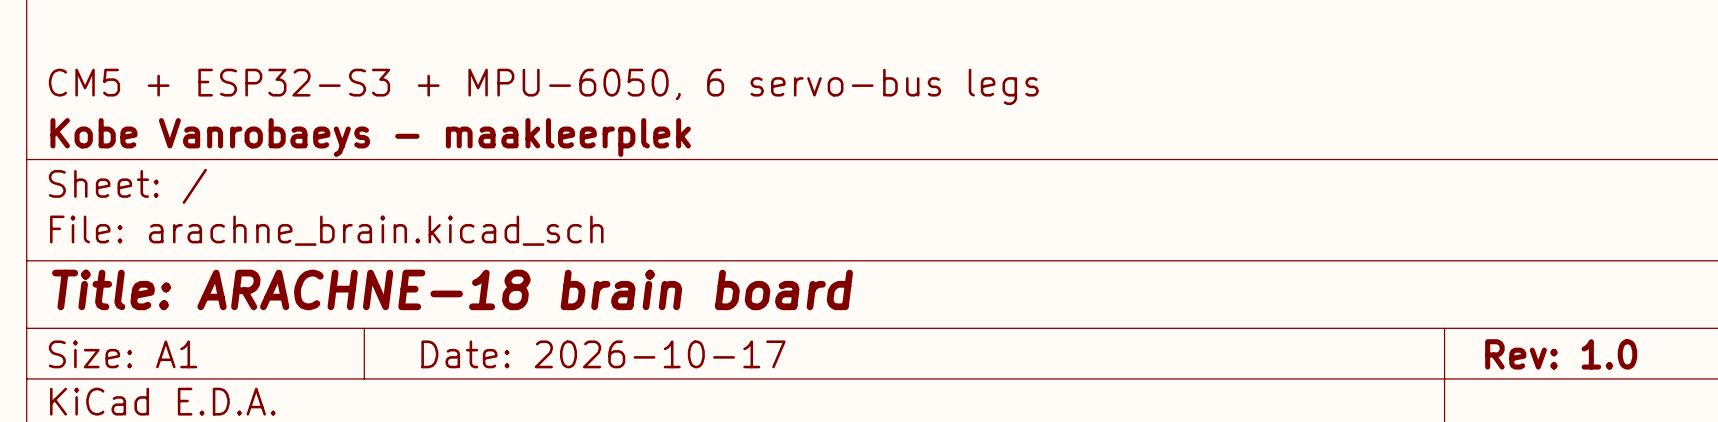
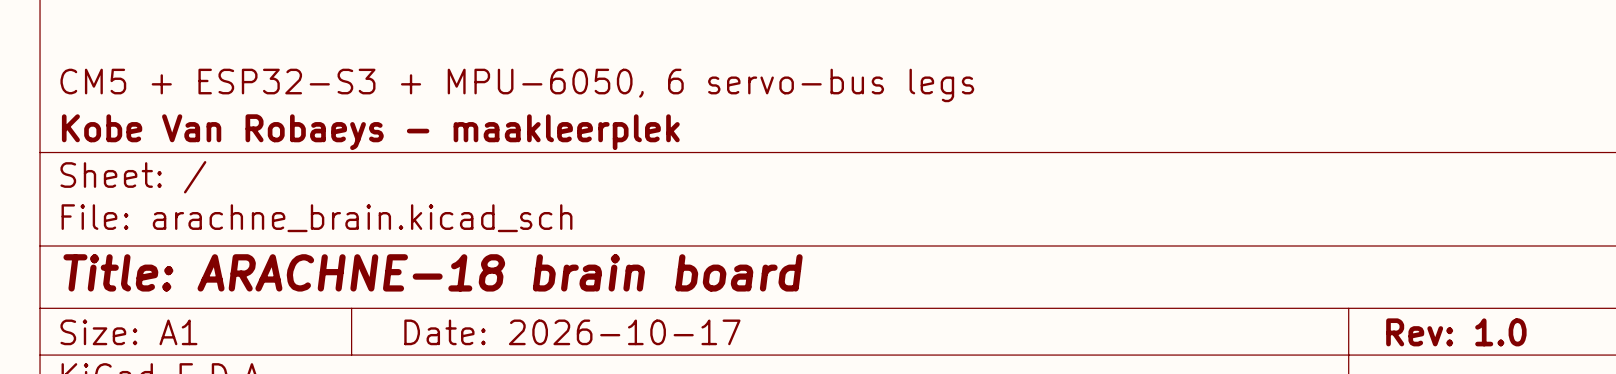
title block: Kobe Vanrobaeys - maakleerplek (370, 137) -> Kobe Van Robaeys - maakleerplek (370, 132)

